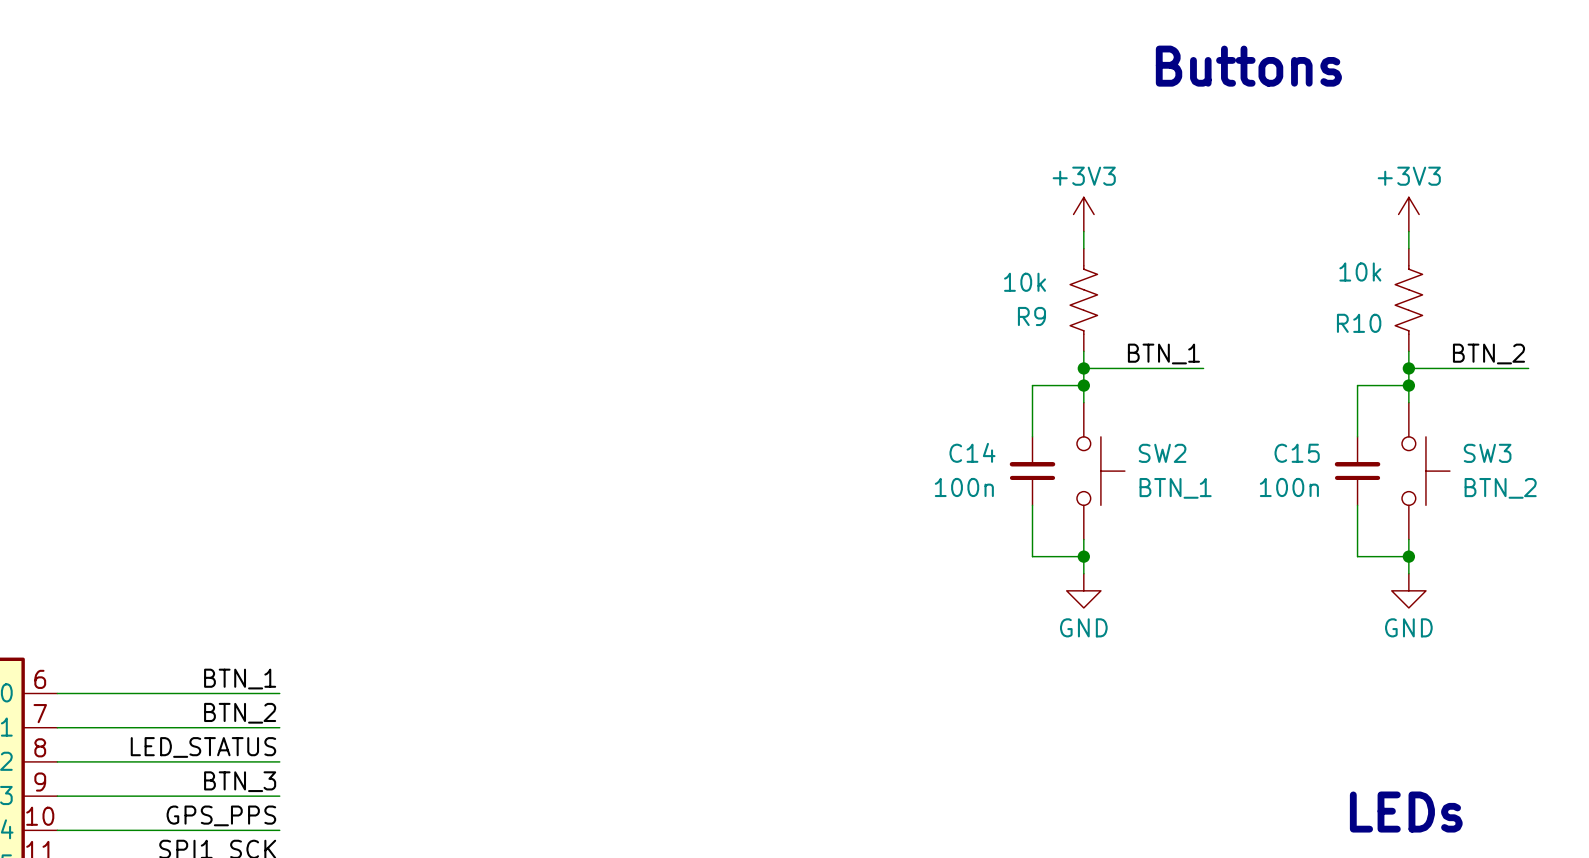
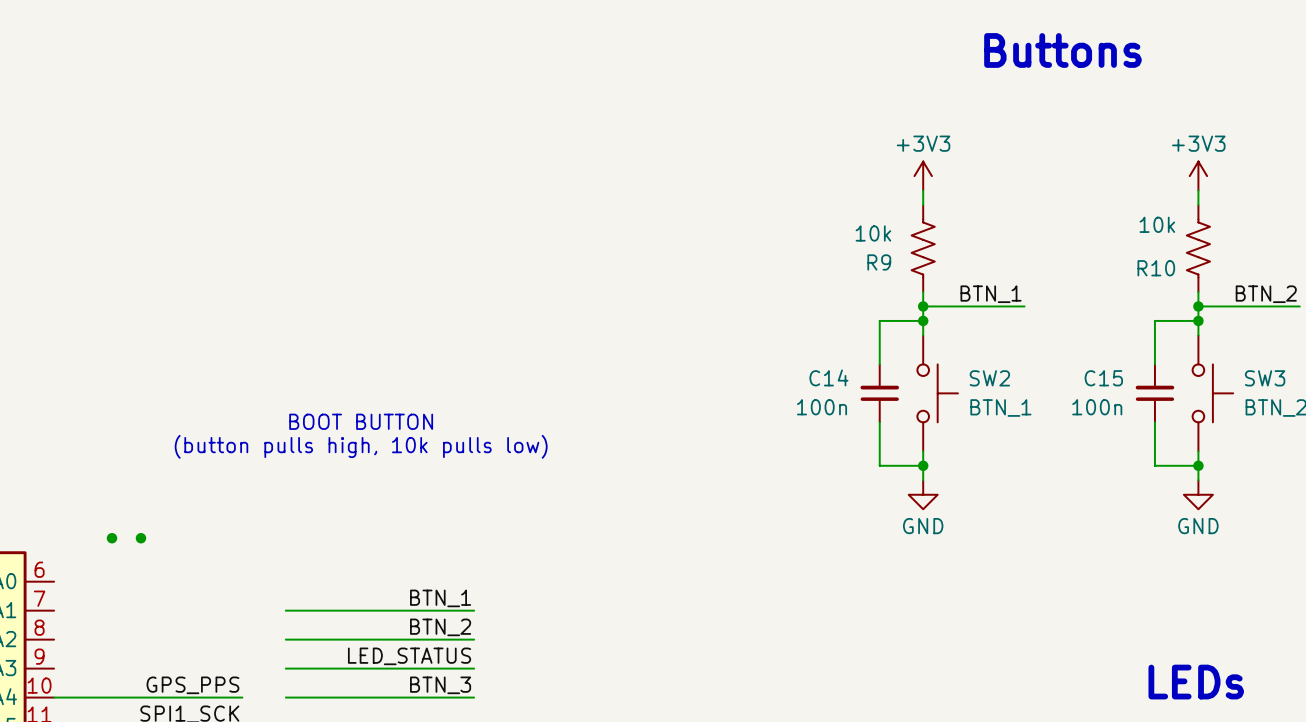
text: none -> BOOT BUTTON (361, 421)
text: none -> (button pulls high, 10k pulls low) (361, 446)
junction: none -> (112, 538)
junction: none -> (140, 538)
label position: BTN_1 (240, 679) -> BTN_1 (440, 598)
wire: (57, 693) (279, 693) -> (285, 610) (474, 610)
label position: BTN_2 (240, 713) -> BTN_2 (440, 627)
wire: (57, 727) (279, 727) -> (285, 639) (474, 639)
label: LED_STATUS (203, 747) -> none
wire: (57, 761) (279, 761) -> (285, 668) (474, 668)
label position: BTN_3 (240, 781) -> BTN_3 (440, 685)
label: none -> LED_STATUS (409, 656)
wire: (57, 796) (279, 796) -> (285, 697) (474, 697)

